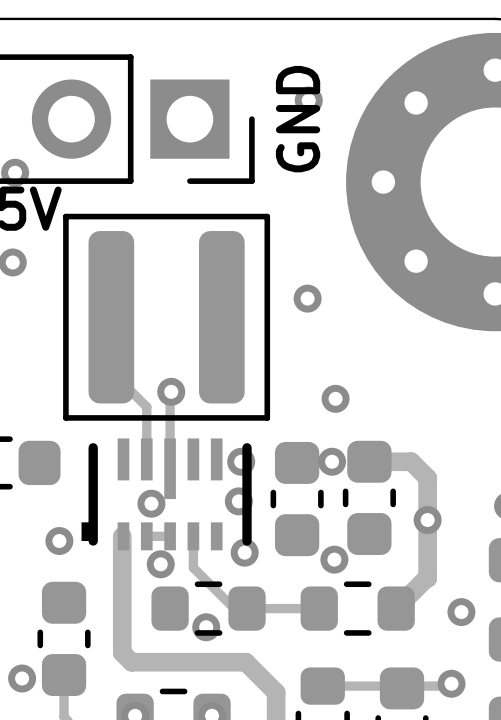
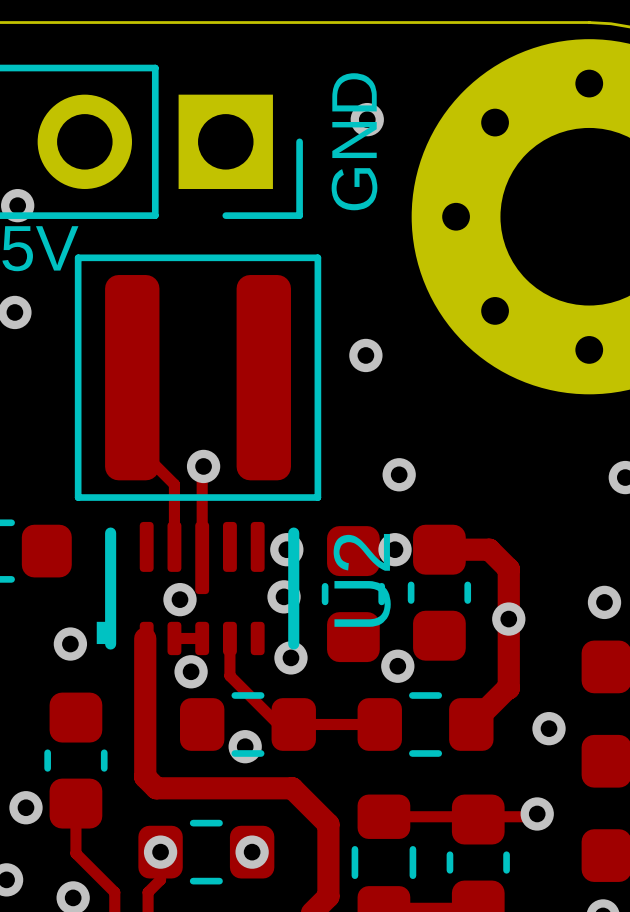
part: (166, 494) -> none
U2: none -> (198, 588)

